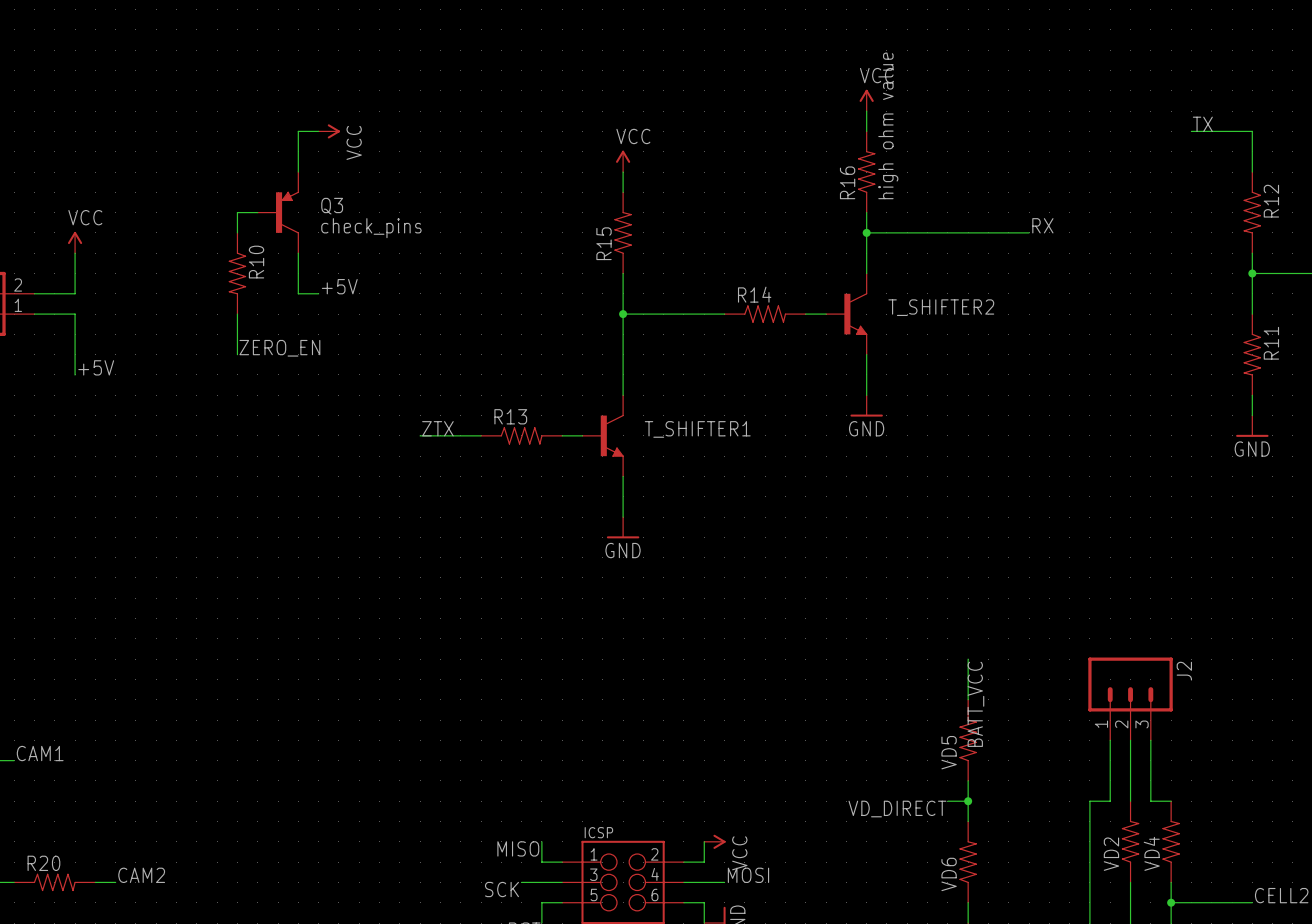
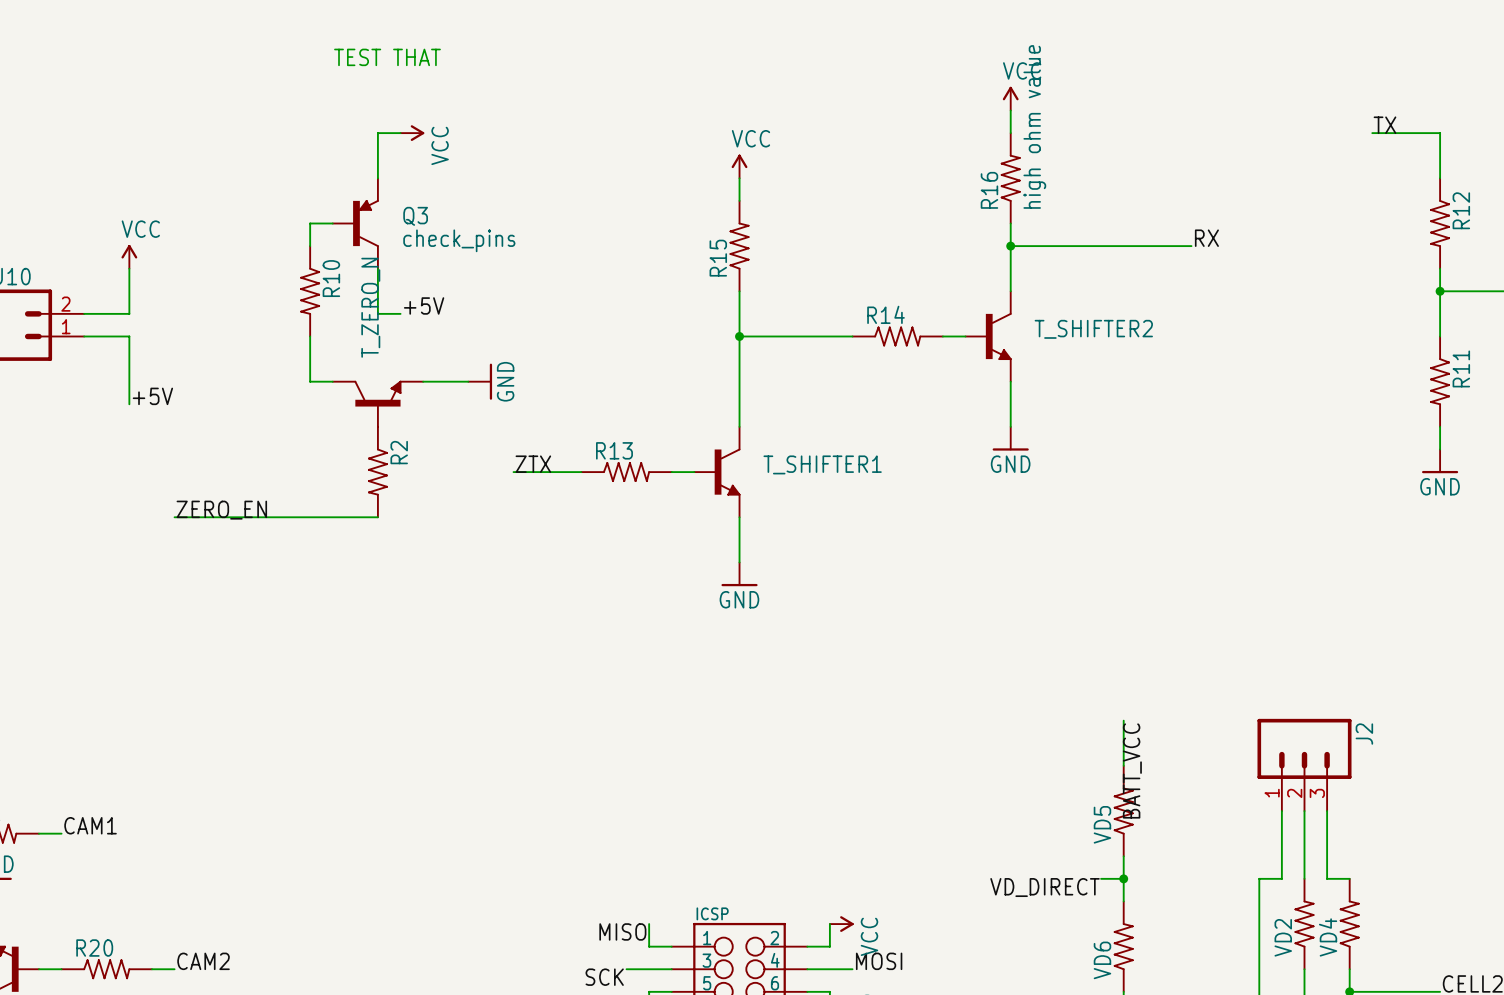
text: none -> TEST THAT (387, 57)
label position: ZERO_EN (279, 348) -> ZERO_EN (221, 510)
wire: none -> (423, 381) (468, 381)
power symbol: none -> GND (480, 381)
T_ZERO_N: none -> (377, 403)
R2: none -> (377, 472)
wire: none -> (174, 517) (377, 517)

